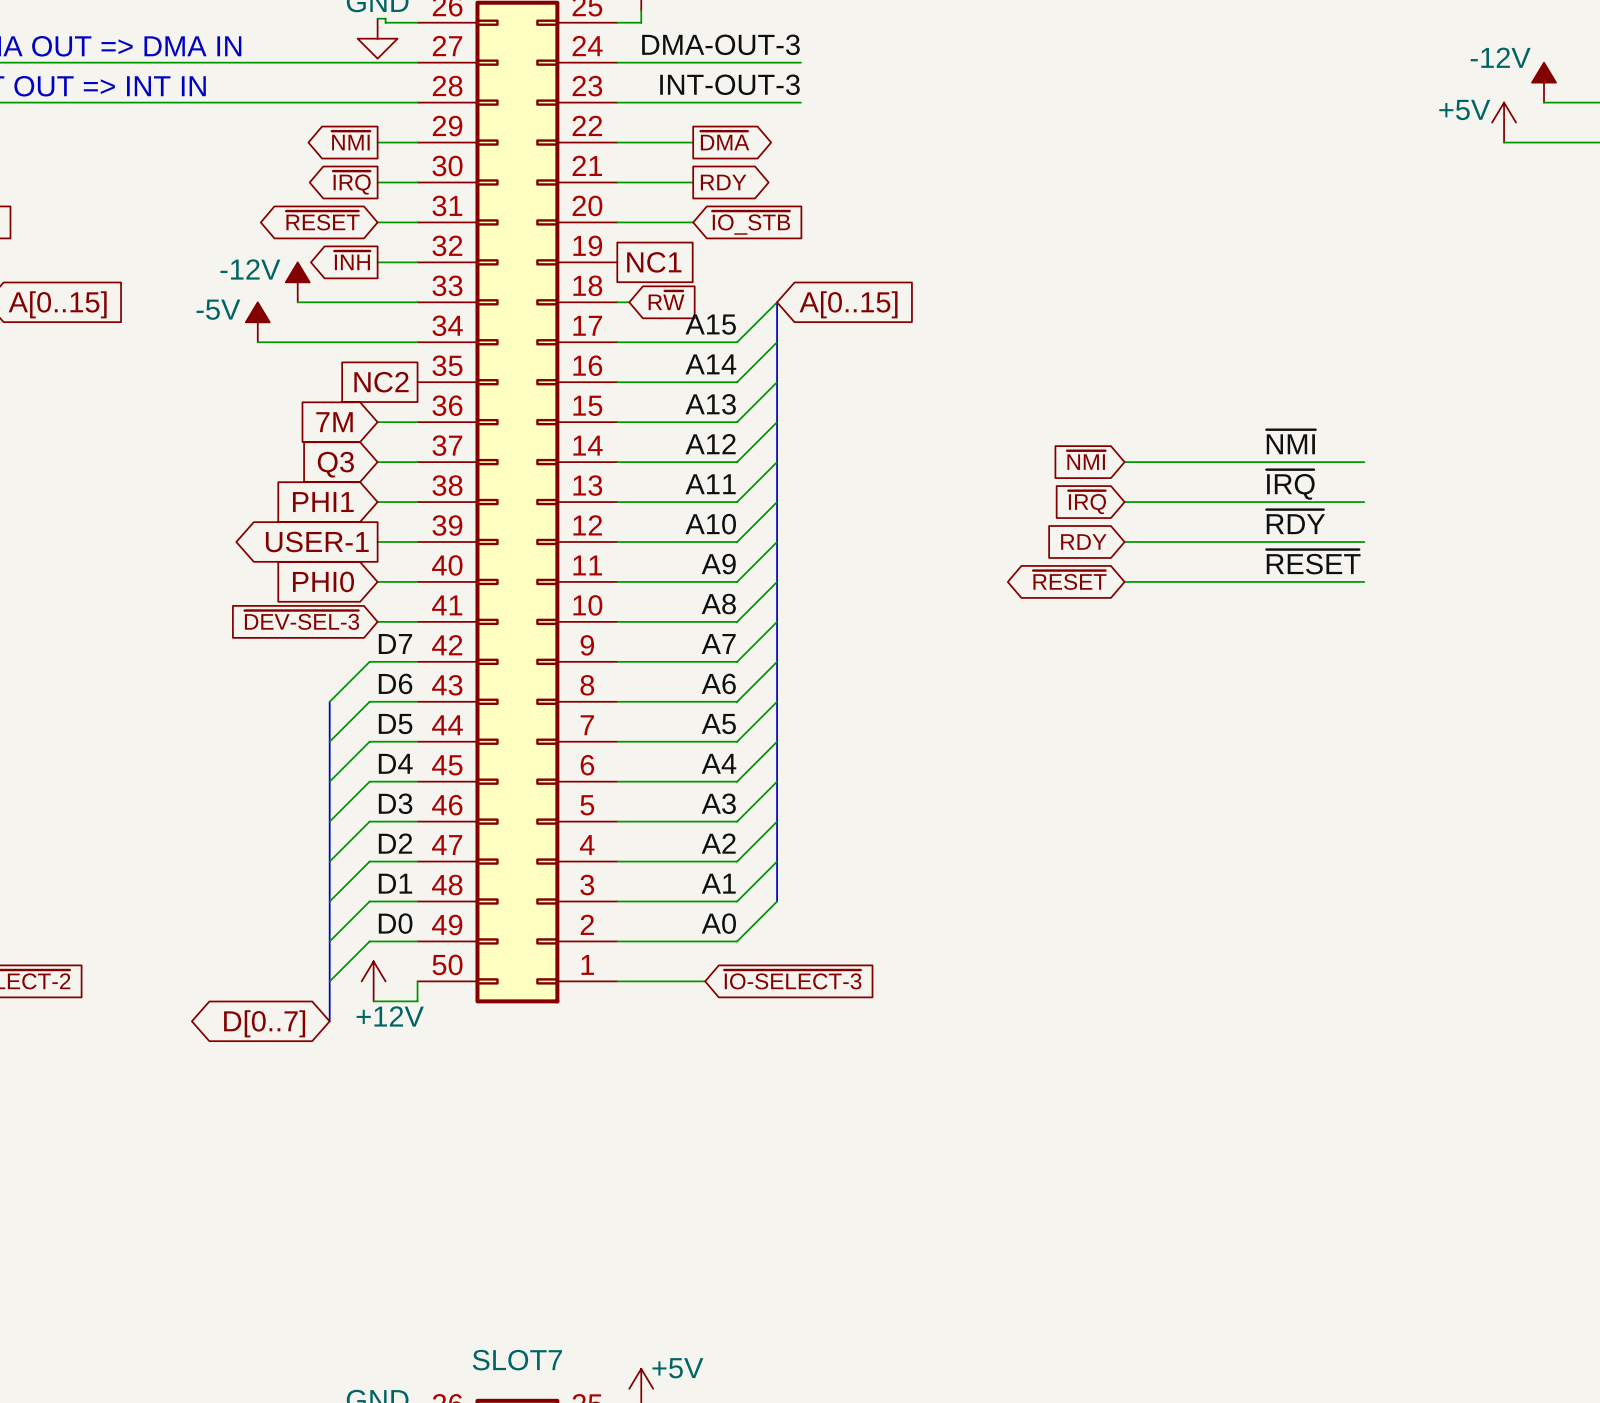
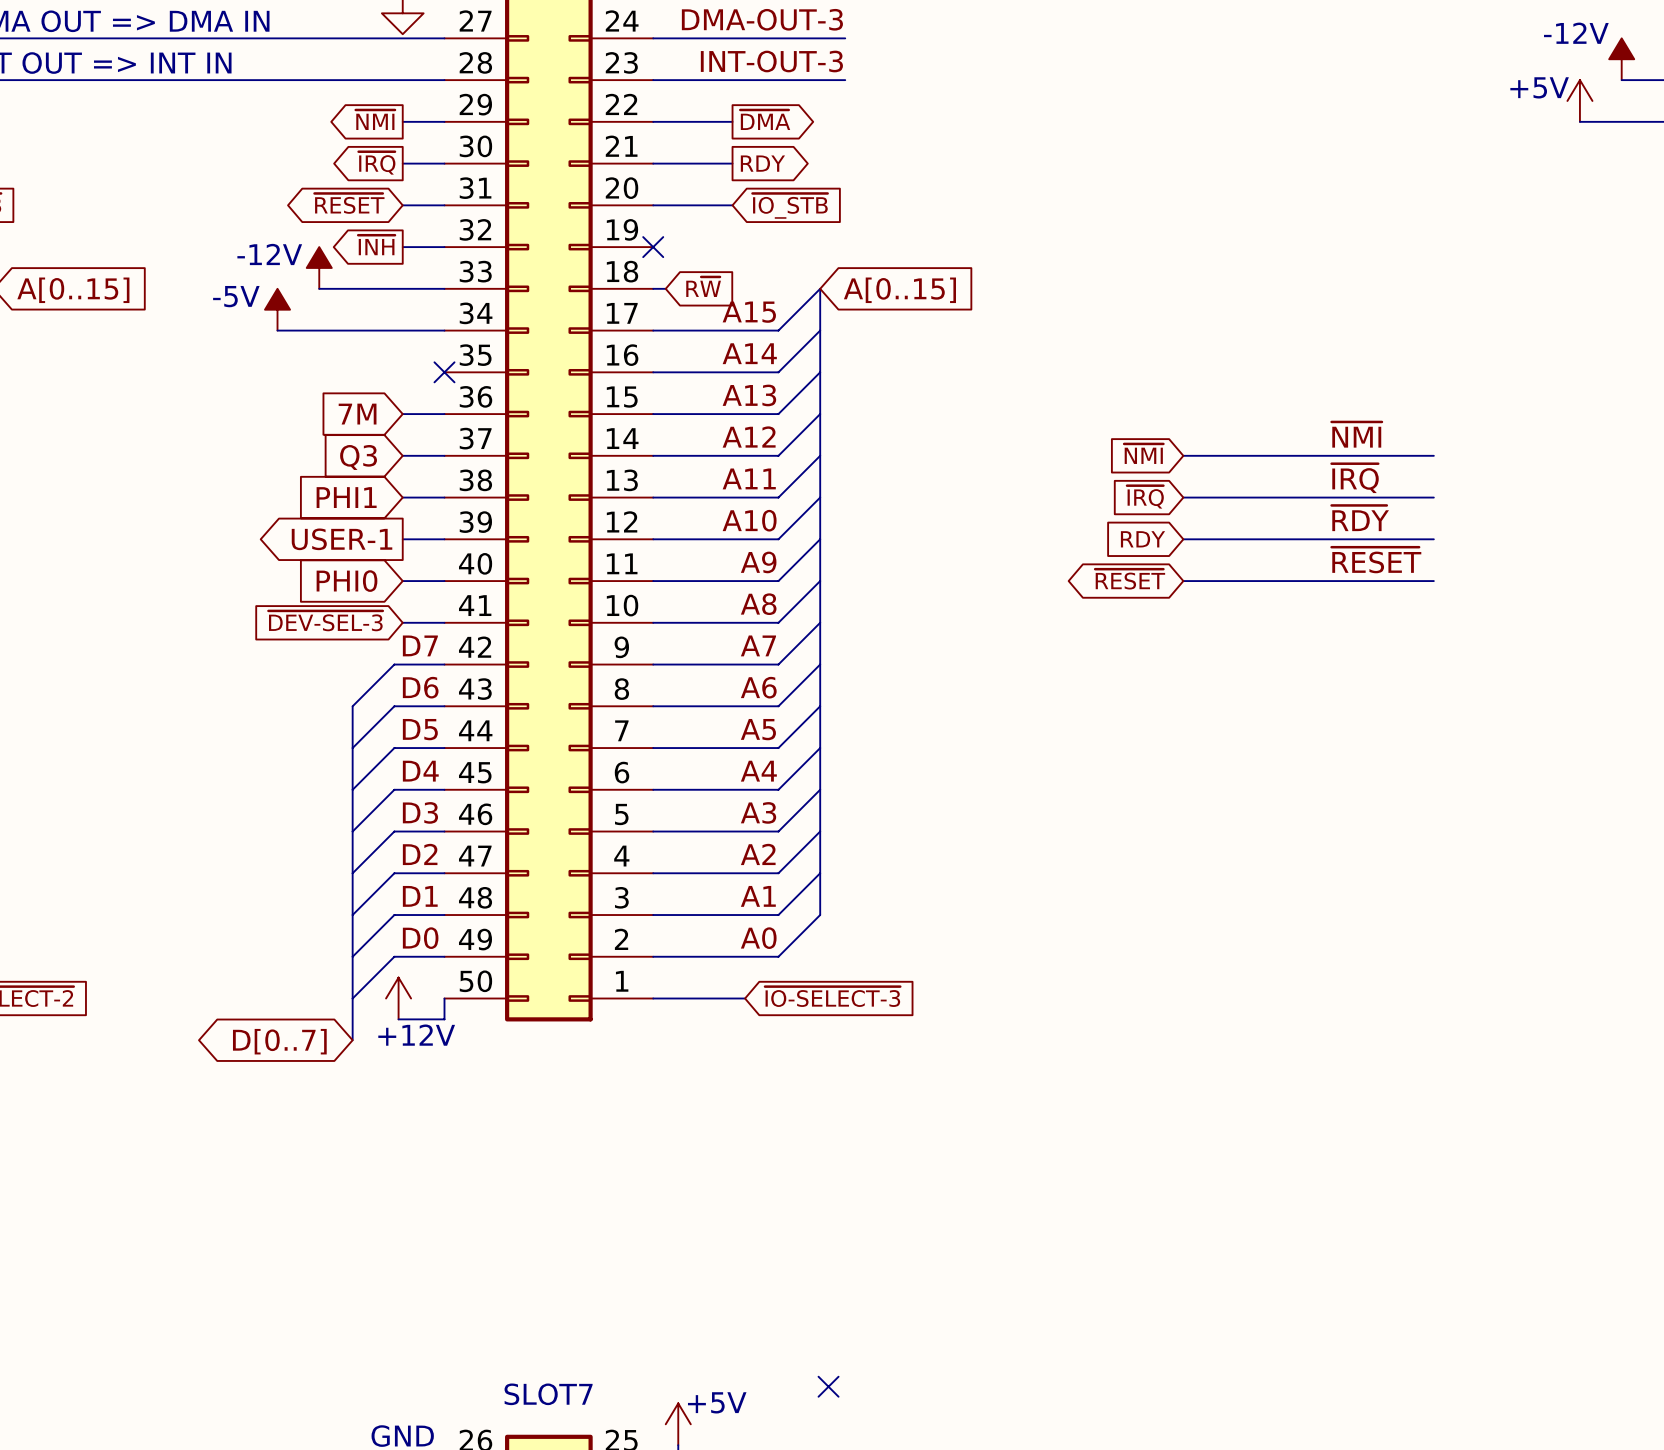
no-connect mark: none -> (653, 247)
global label: NC1 (654, 262) -> none
global label: NC2 (381, 382) -> none
no-connect mark: none -> (444, 372)
no-connect mark: none -> (828, 1386)

